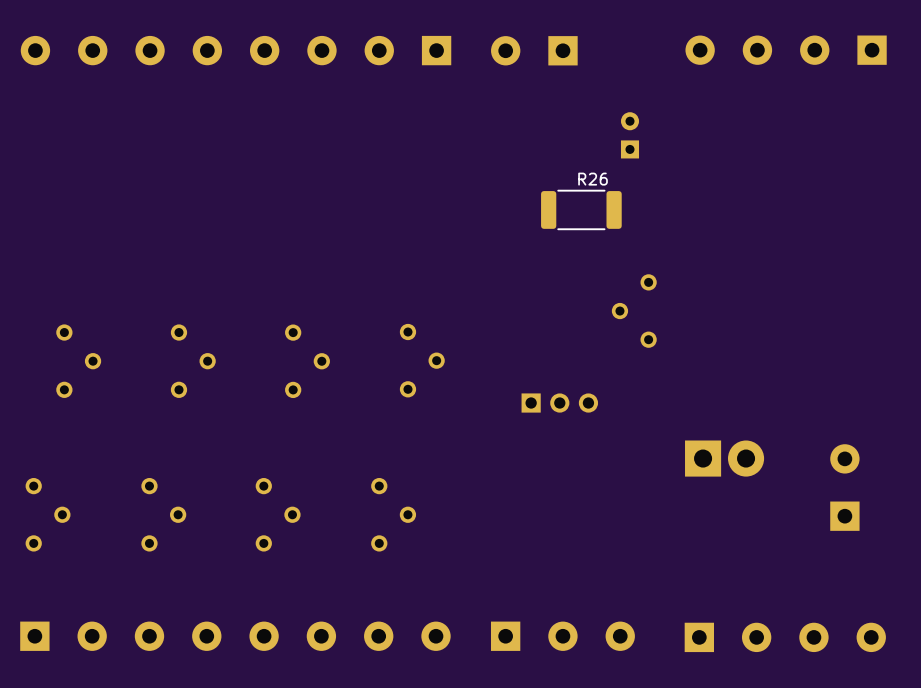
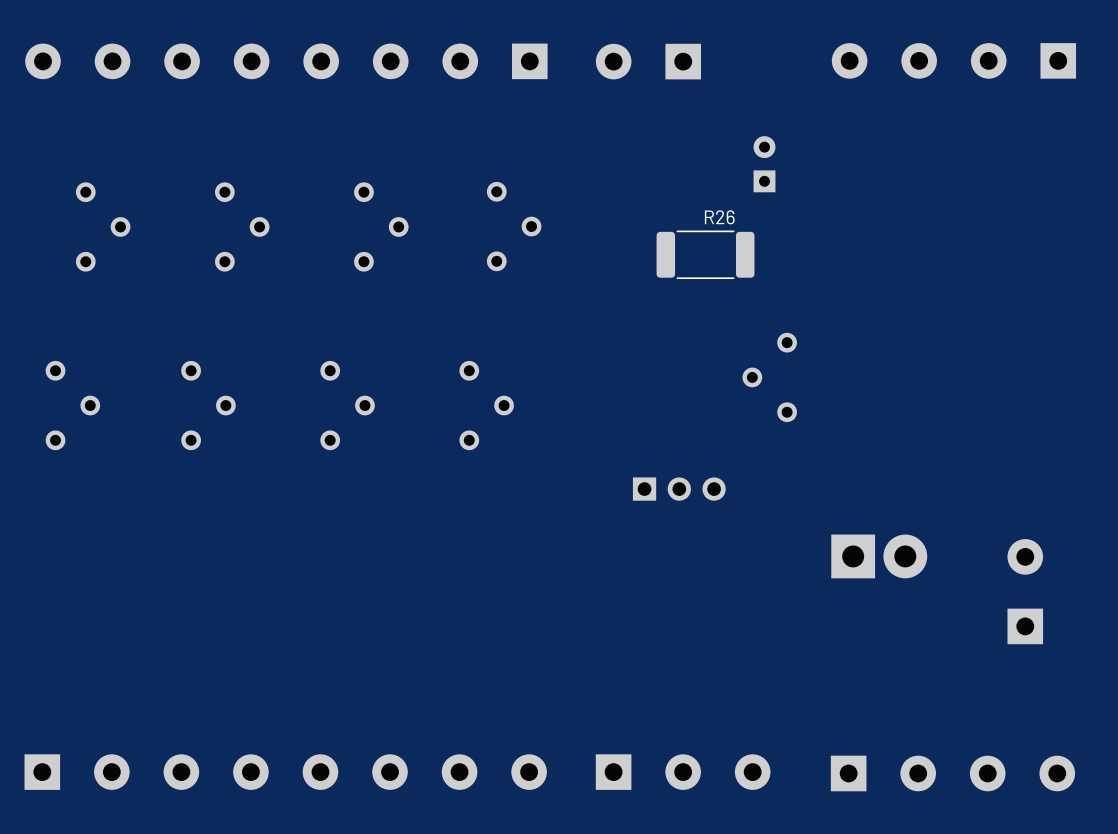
part: none -> (514, 226)
part: none -> (103, 226)
part: none -> (242, 226)
part: none -> (381, 226)
part position: (422, 360) -> (486, 405)
part position: (78, 361) -> (72, 405)
part position: (193, 361) -> (208, 405)
part position: (307, 361) -> (347, 405)
part: (48, 514) -> none
part: (163, 514) -> none
part: (278, 514) -> none
part: (393, 514) -> none

